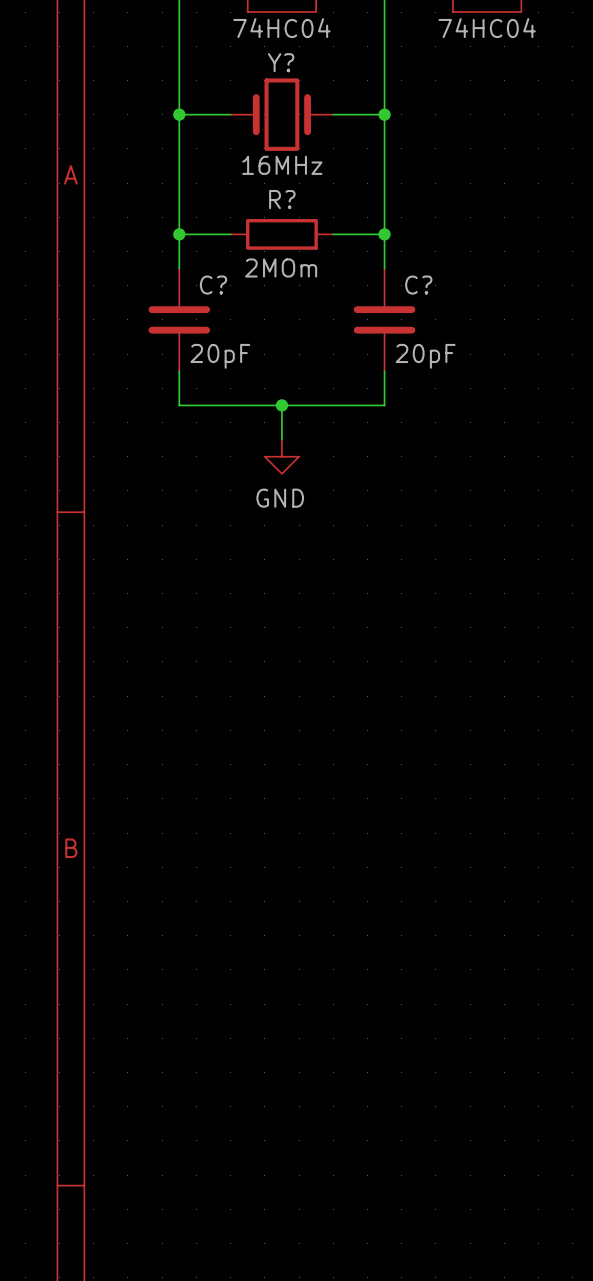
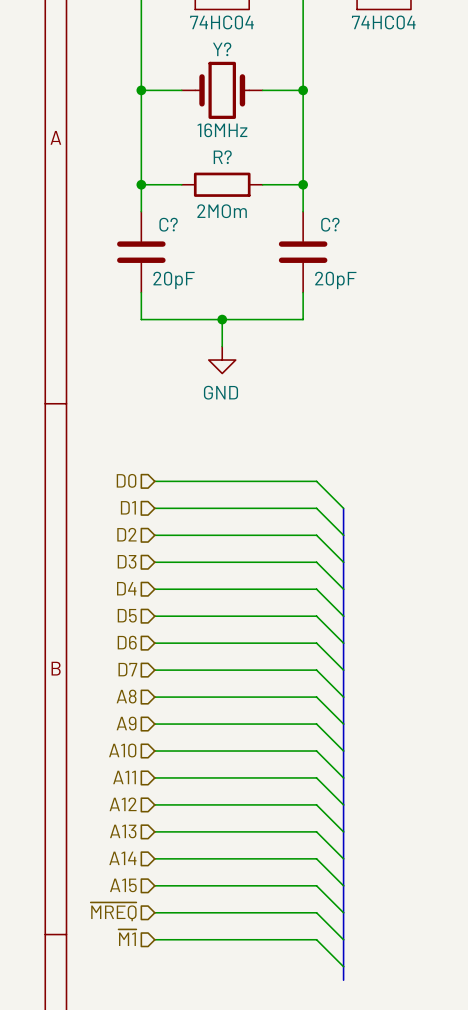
hierarchical label: none -> D0 (126, 480)
wire: none -> (154, 481) (316, 481) (343, 508)
hierarchical label: none -> D1 (128, 507)
wire: none -> (154, 508) (316, 508) (343, 535)
bus: none -> (343, 508) (343, 980)
hierarchical label: none -> D2 (126, 534)
wire: none -> (154, 535) (316, 535) (343, 562)
hierarchical label: none -> D3 (127, 561)
wire: none -> (154, 562) (316, 562) (343, 589)
hierarchical label: none -> D4 (126, 588)
wire: none -> (154, 589) (316, 589) (343, 616)
hierarchical label: none -> D5 (127, 615)
wire: none -> (154, 616) (316, 616) (343, 643)
hierarchical label: none -> D6 (127, 642)
wire: none -> (154, 643) (316, 643) (343, 670)
hierarchical label: none -> D7 (127, 669)
wire: none -> (154, 670) (316, 670) (343, 697)
hierarchical label: none -> A8 (126, 696)
wire: none -> (154, 697) (316, 697) (343, 724)
hierarchical label: none -> A9 (126, 723)
wire: none -> (154, 724) (316, 724) (343, 751)
hierarchical label: none -> A10 (122, 750)
wire: none -> (154, 751) (316, 751) (343, 777)
hierarchical label: none -> A11 (124, 777)
wire: none -> (154, 777) (316, 777) (343, 804)
hierarchical label: none -> A12 (123, 804)
wire: none -> (154, 804) (316, 804) (343, 831)
hierarchical label: none -> A13 (123, 831)
wire: none -> (154, 831) (316, 831) (343, 858)
hierarchical label: none -> A14 (122, 858)
wire: none -> (154, 858) (316, 858) (343, 885)
hierarchical label: none -> A15 (123, 885)
wire: none -> (154, 885) (316, 885) (343, 912)
hierarchical label: none -> ~{MREQ} (113, 911)
wire: none -> (154, 912) (316, 912) (343, 939)
hierarchical label: none -> ~{M1} (127, 937)
wire: none -> (154, 939) (316, 939) (343, 966)

